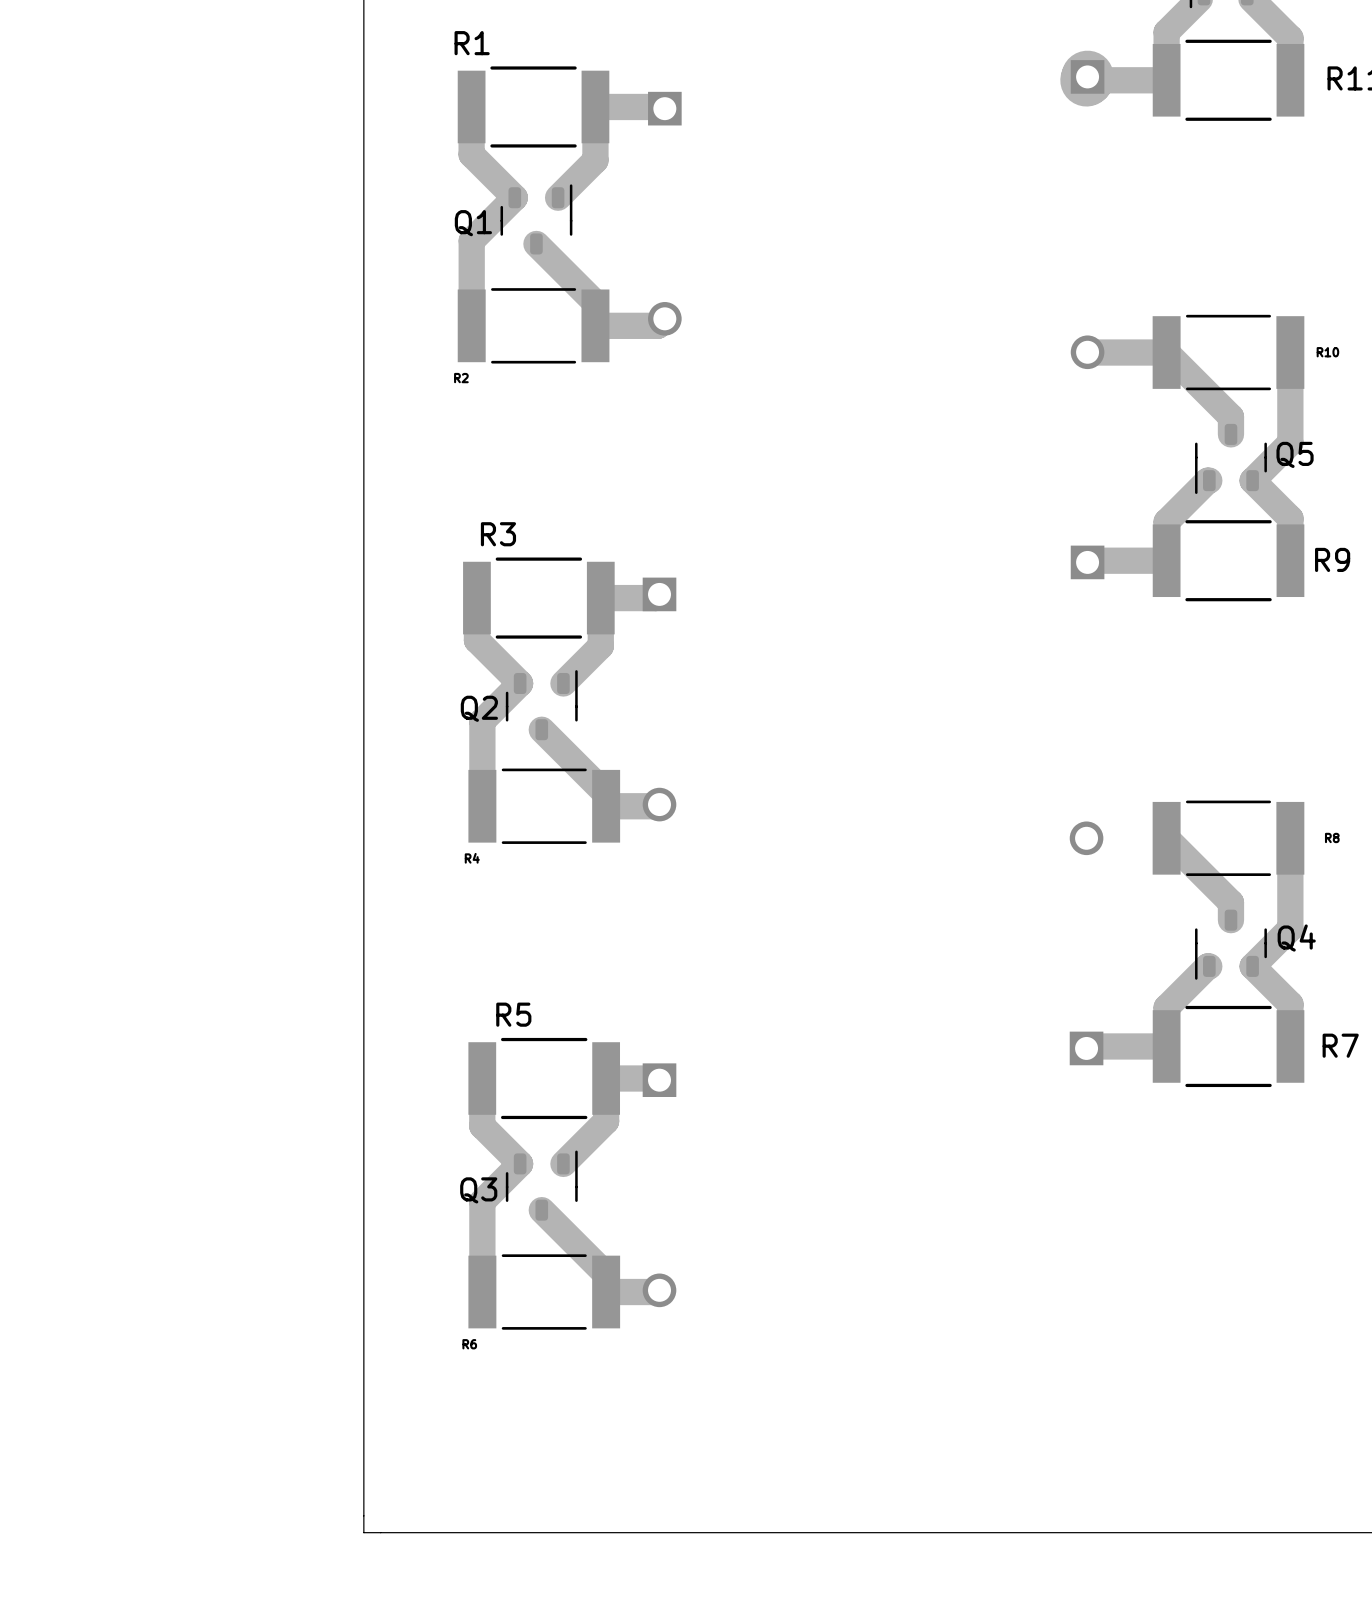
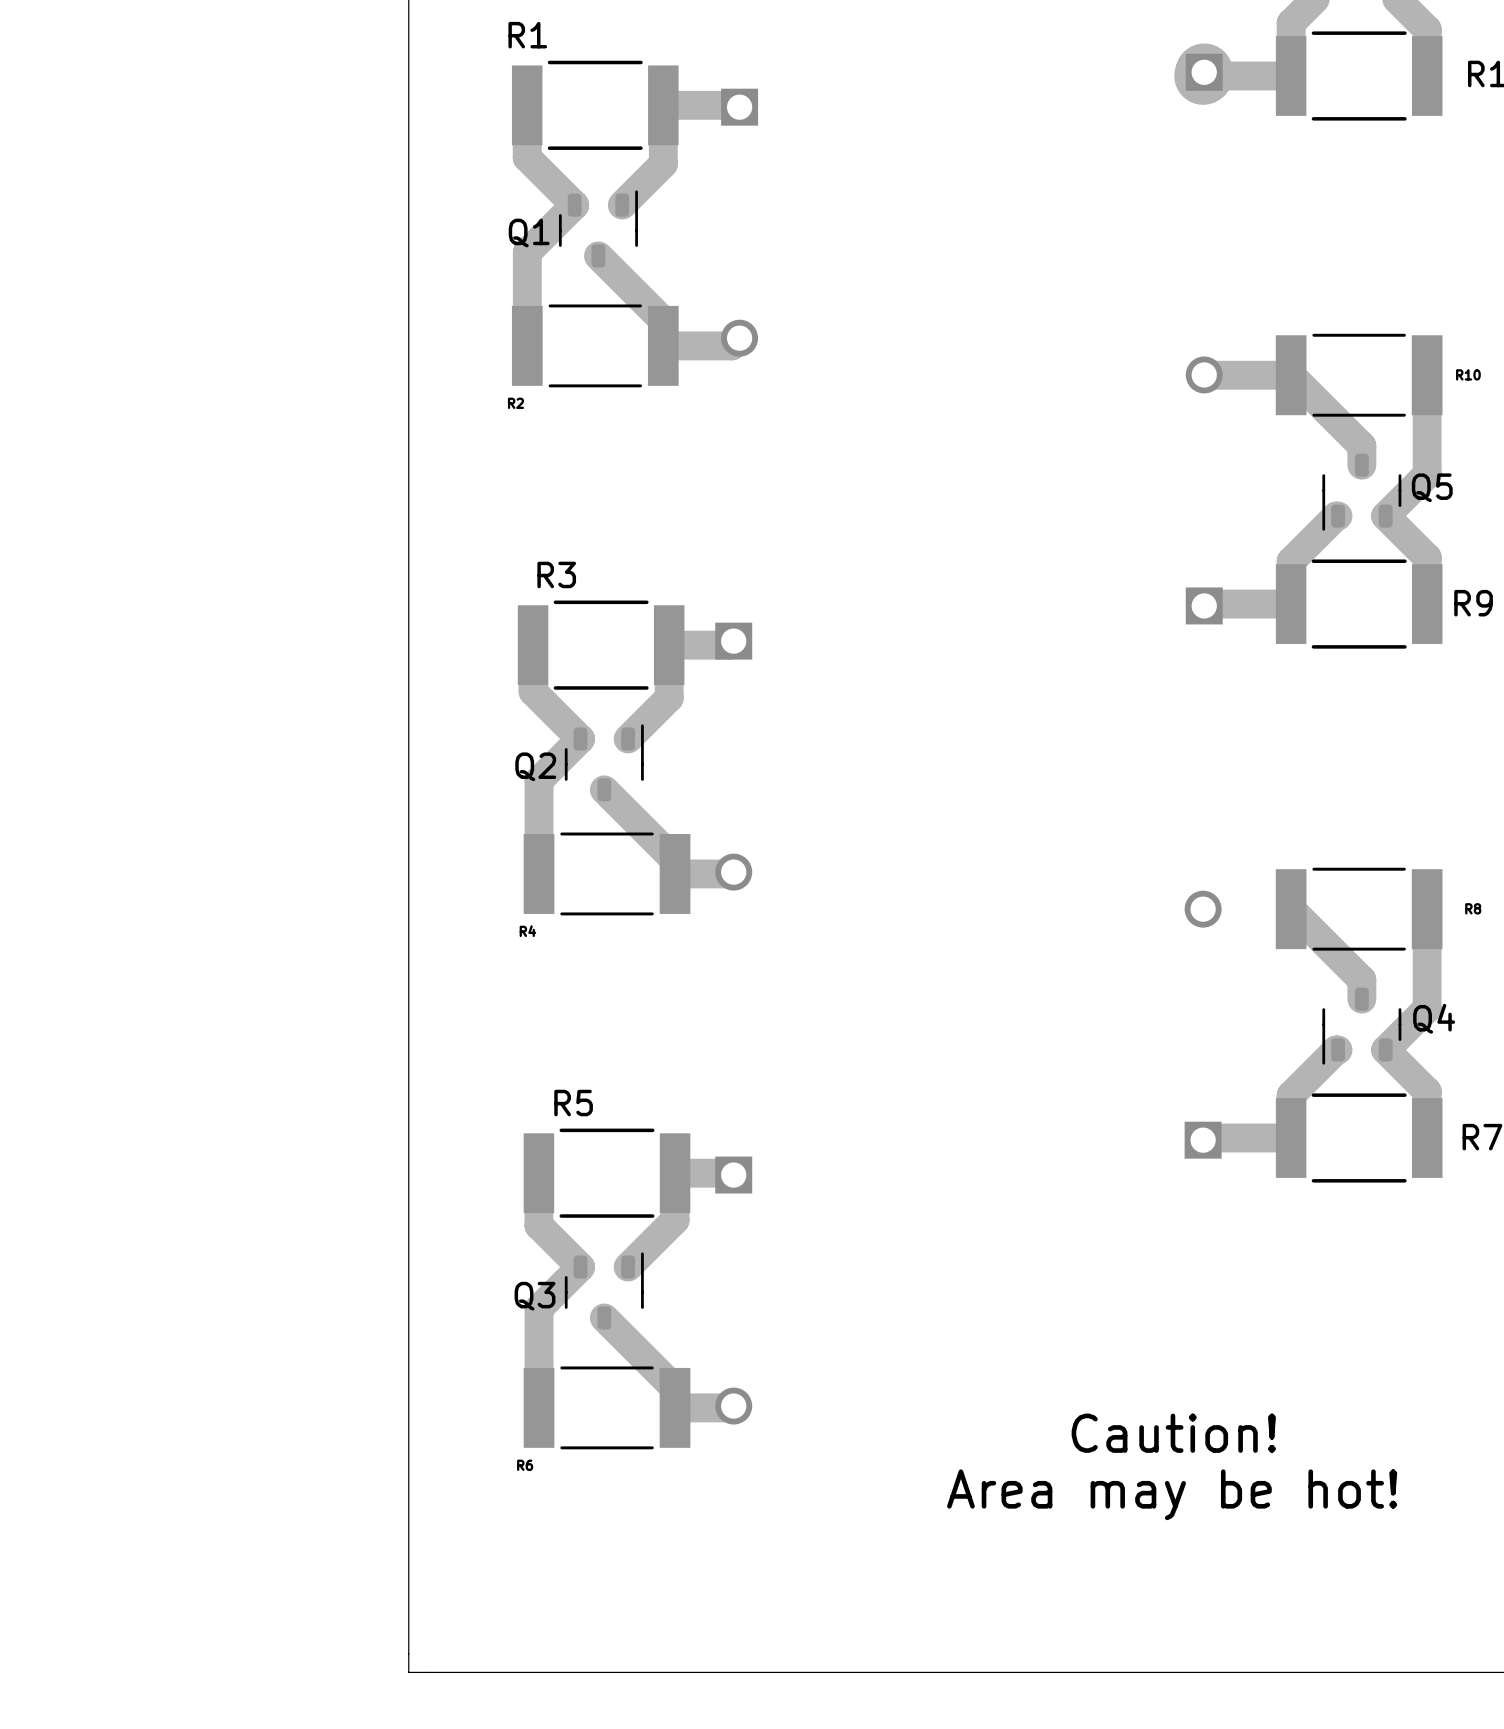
text: none -> Caution! (1173, 1433)
text: none -> Area may be hot! (1172, 1494)

